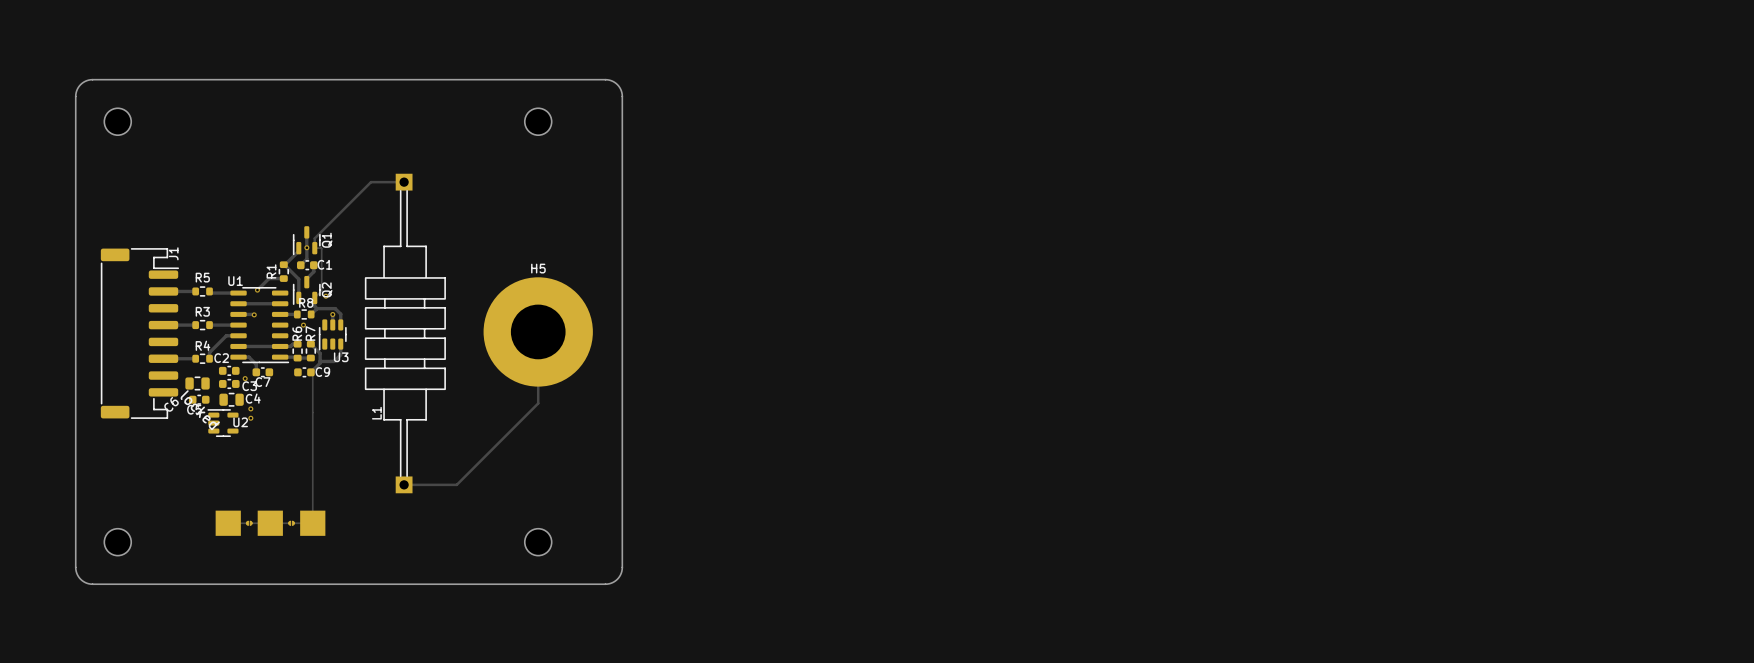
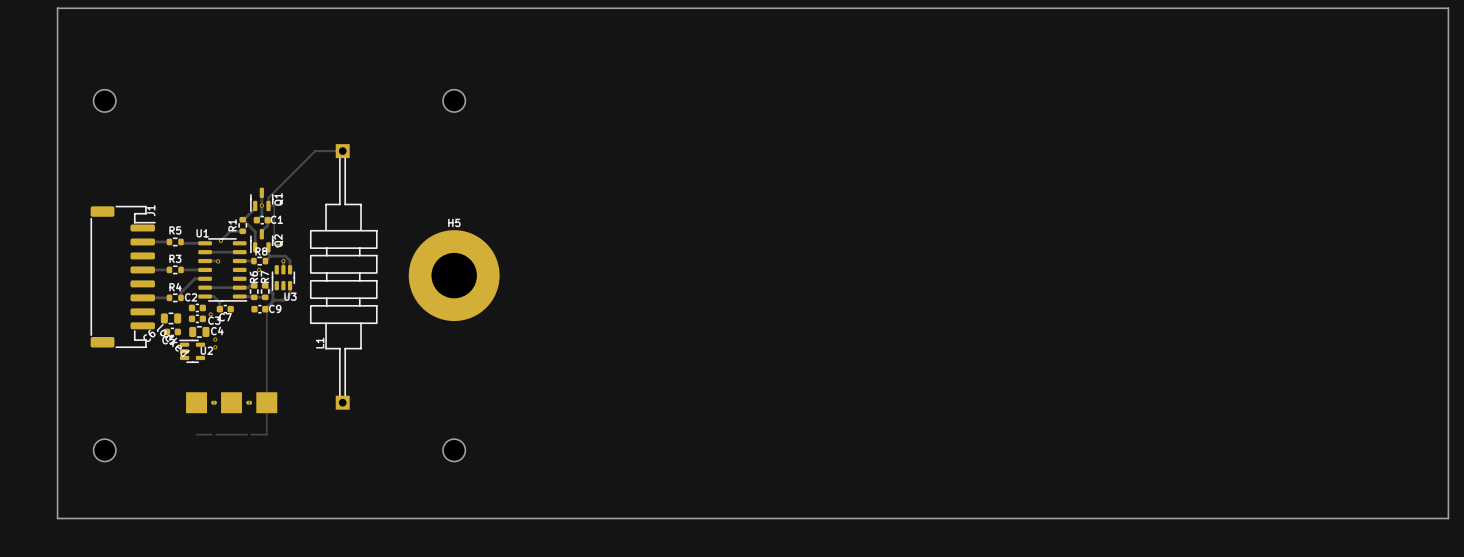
board edge: none -> (57, 8) (1448, 8) (1448, 518) (57, 518) (57, 8)
board edge: (92, 79) (605, 79) (617, 84) (622, 96) (622, 567) (617, 579) (605, 584) (92, 584) (80, 579) (75, 567) (75, 96) (80, 84) (92, 79) -> none
track: (538, 331) (538, 403) (456, 484) (404, 484) -> none
part: none -> (196, 402)
part: none -> (214, 402)
part: none -> (231, 402)
part: none -> (249, 402)
part: none -> (266, 402)
part: (228, 523) -> none
part: (249, 523) -> none
part: (270, 523) -> none
part: (291, 523) -> none
part: (312, 523) -> none

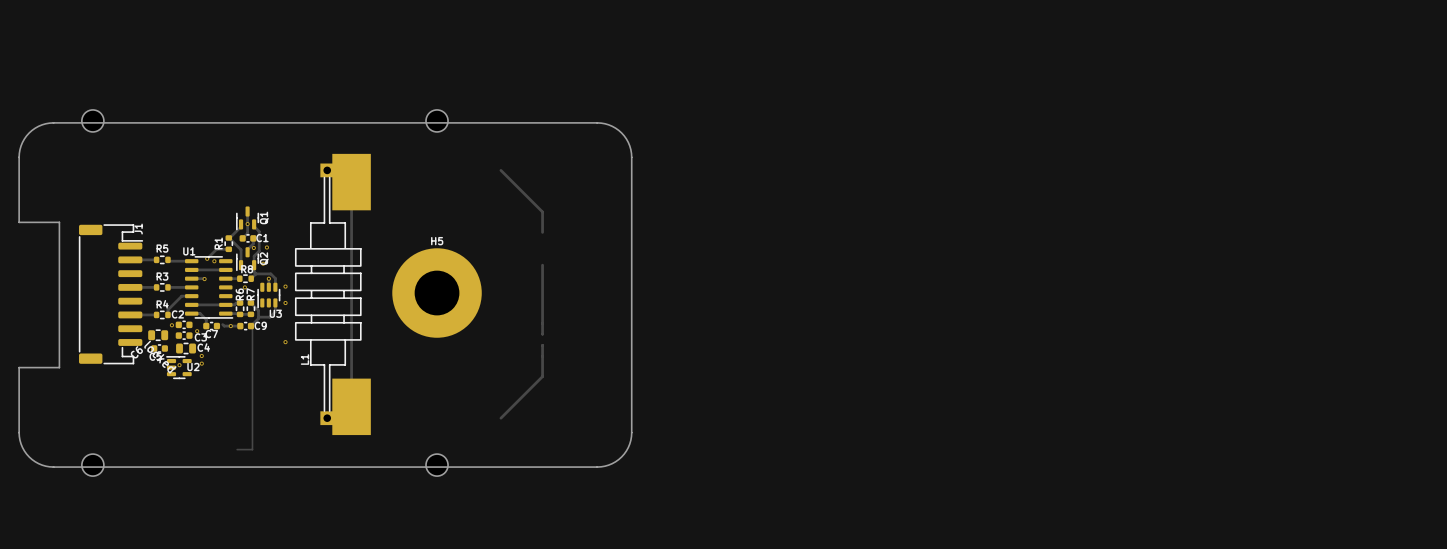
board edge: (57, 8) (1448, 8) (1448, 518) (57, 518) (57, 8) -> none
board edge: none -> (53, 122) (597, 122) (615, 128) (626, 139) (631, 157) (631, 432) (626, 450) (612, 463) (597, 467) (53, 467) (35, 461) (24, 450) (19, 440) (19, 367) (59, 367) (59, 222) (19, 222) (19, 157) (22, 142) (29, 132) (42, 124) (53, 122)
track: (342, 151) (315, 151) (268, 197) (268, 205) (274, 206) (274, 241) (268, 247) -> (254, 224) (259, 231) (259, 251) (254, 256) (254, 265)
track: none -> (500, 170) (542, 212) (542, 232)
track: none -> (351, 182) (351, 406)
part: none -> (351, 182)
via: none -> (253, 247)
via: none -> (266, 247)
via: none -> (214, 261)
track: none -> (542, 265) (542, 334)
via: none -> (285, 286)
via: none -> (285, 303)
track: none -> (222, 324) (240, 326)
via: none -> (171, 325)
via: none -> (230, 326)
via: none -> (285, 342)
track: none -> (542, 345) (542, 376) (500, 418)
via: none -> (179, 365)
part: none -> (351, 406)
part: (196, 402) -> none
part: (214, 402) -> none
part: (231, 402) -> none
part: (249, 402) -> none
part: (266, 402) -> none
track: (196, 434) (211, 434) -> none
track: (216, 434) (247, 434) -> none

